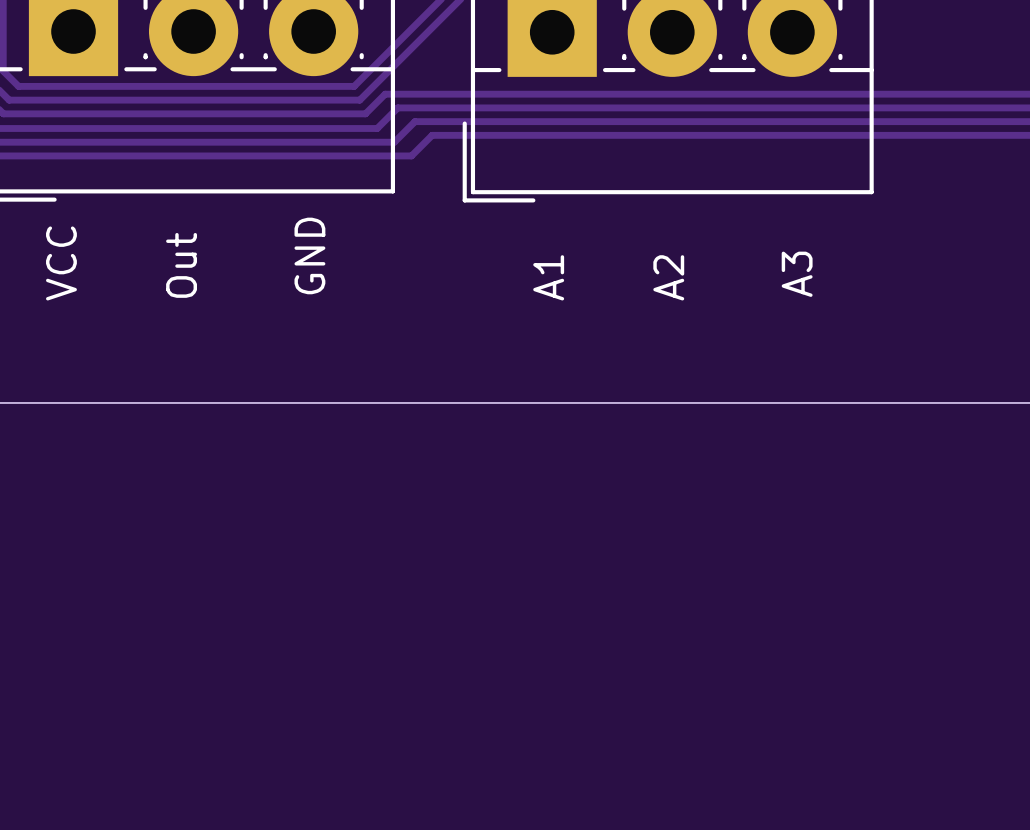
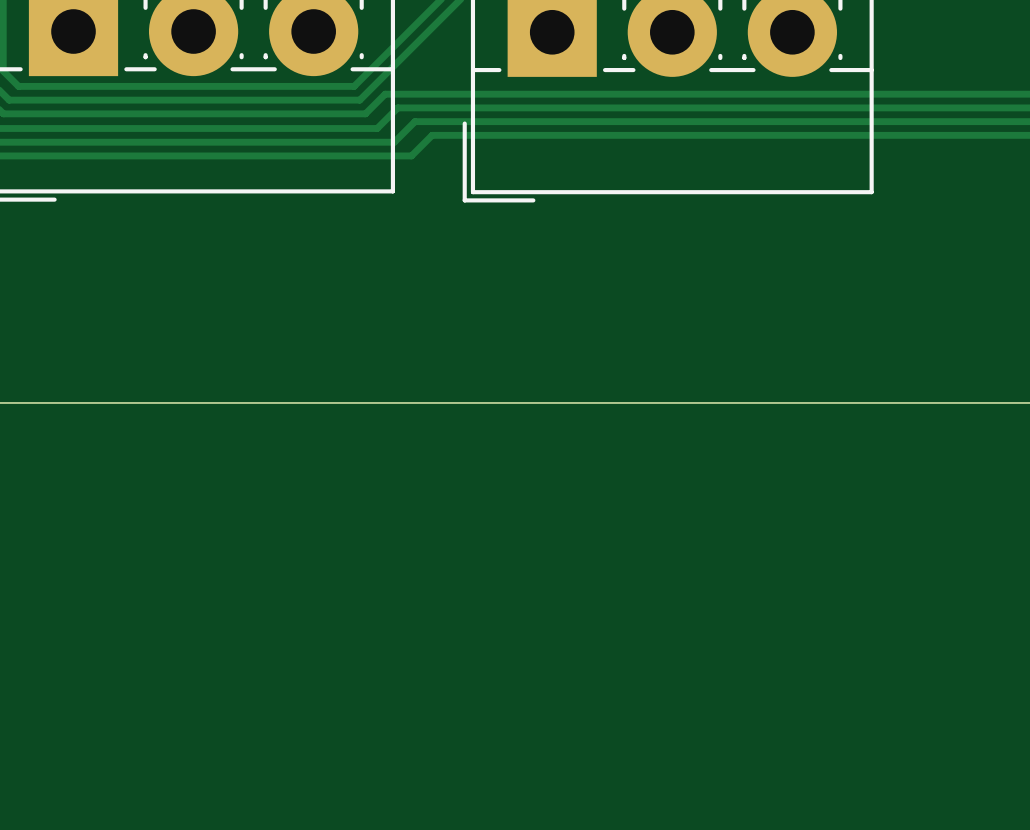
text: GND (309, 255) -> none
text: VCC (61, 263) -> none
text: Out (181, 265) -> none
text: A3 (797, 274) -> none
text: A1 (548, 277) -> none
text: A2 (668, 277) -> none

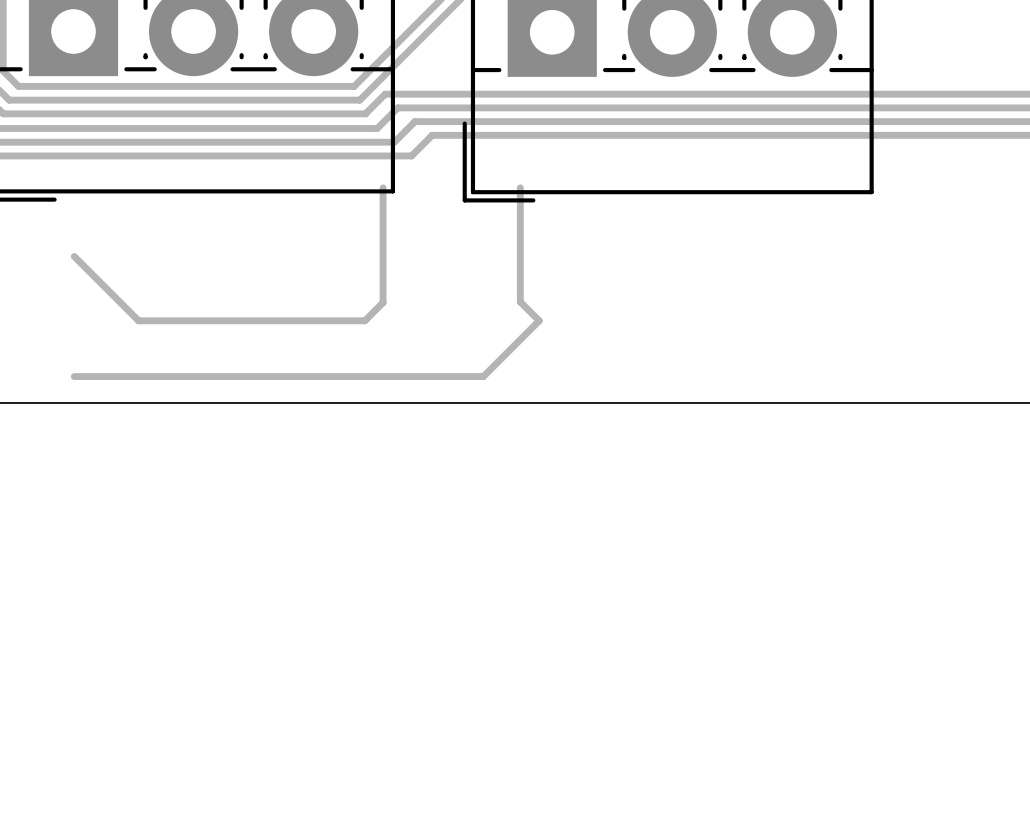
track: none -> (383, 187) (383, 302) (364, 320) (138, 320) (74, 256)
track: none -> (520, 187) (520, 301) (539, 320) (483, 376) (74, 376)

